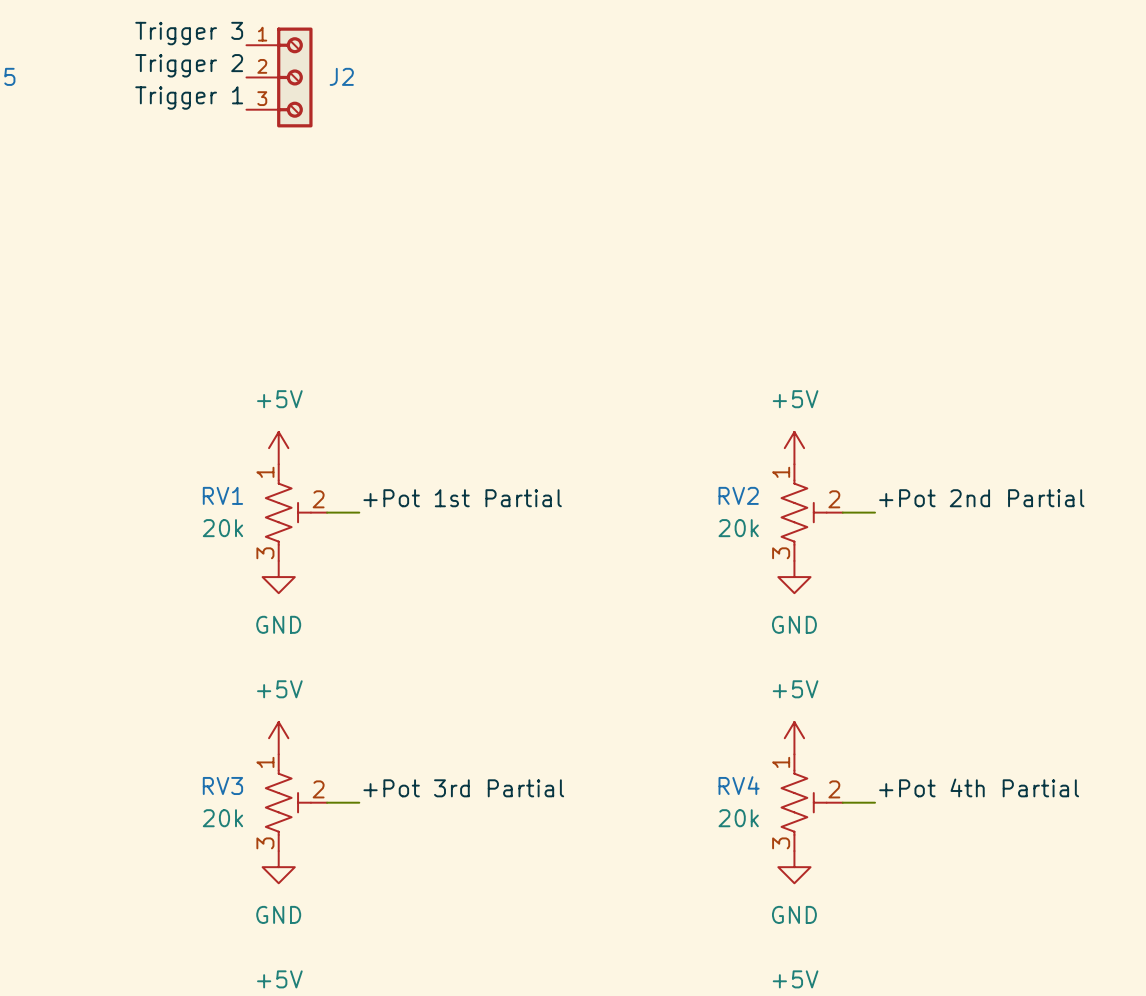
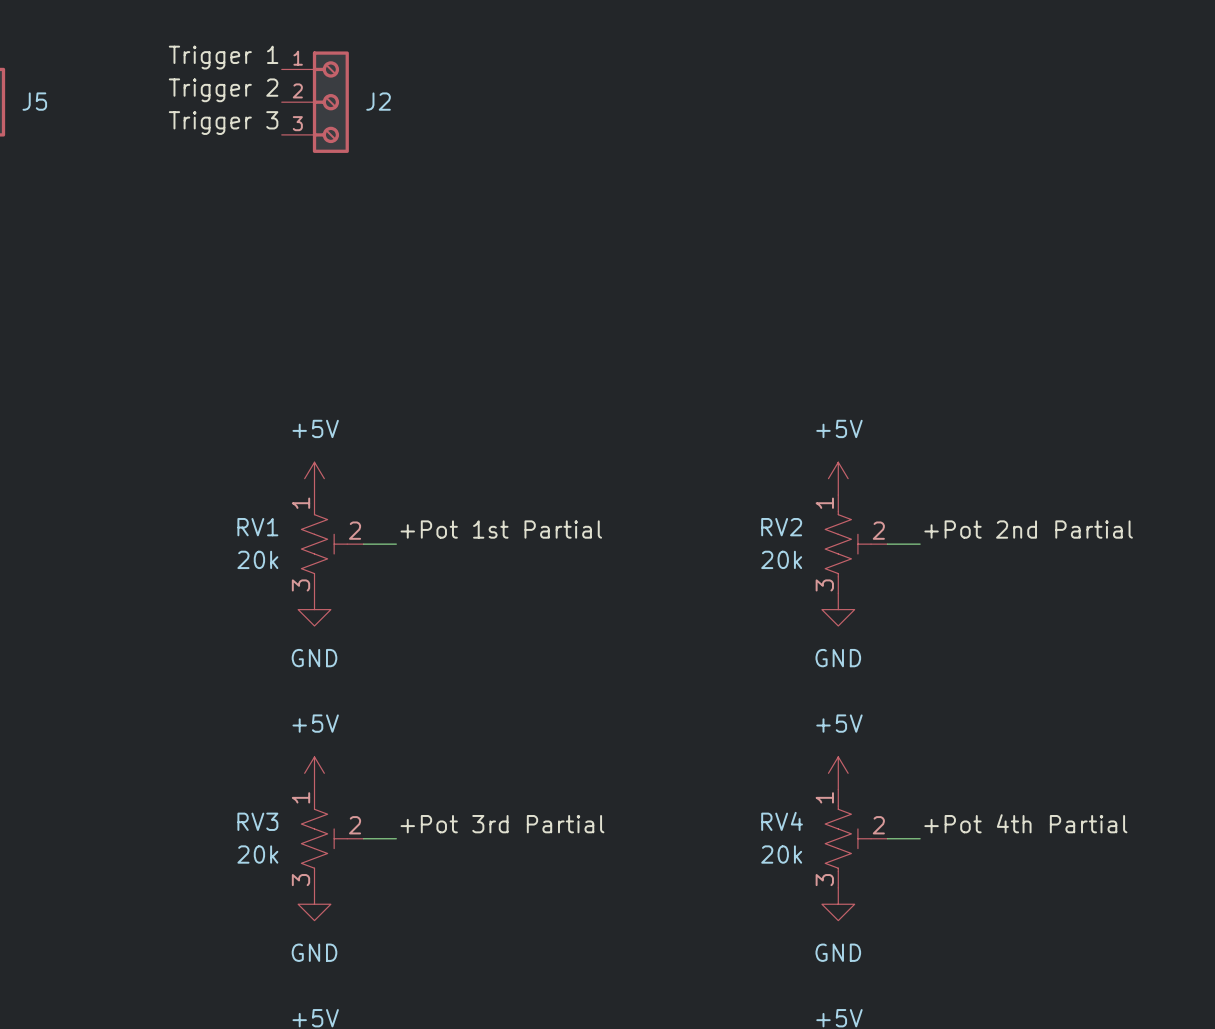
label: Trigger 3 (189, 33) -> Trigger 1 (223, 57)
label: Trigger 1 (189, 98) -> Trigger 3 (223, 123)

